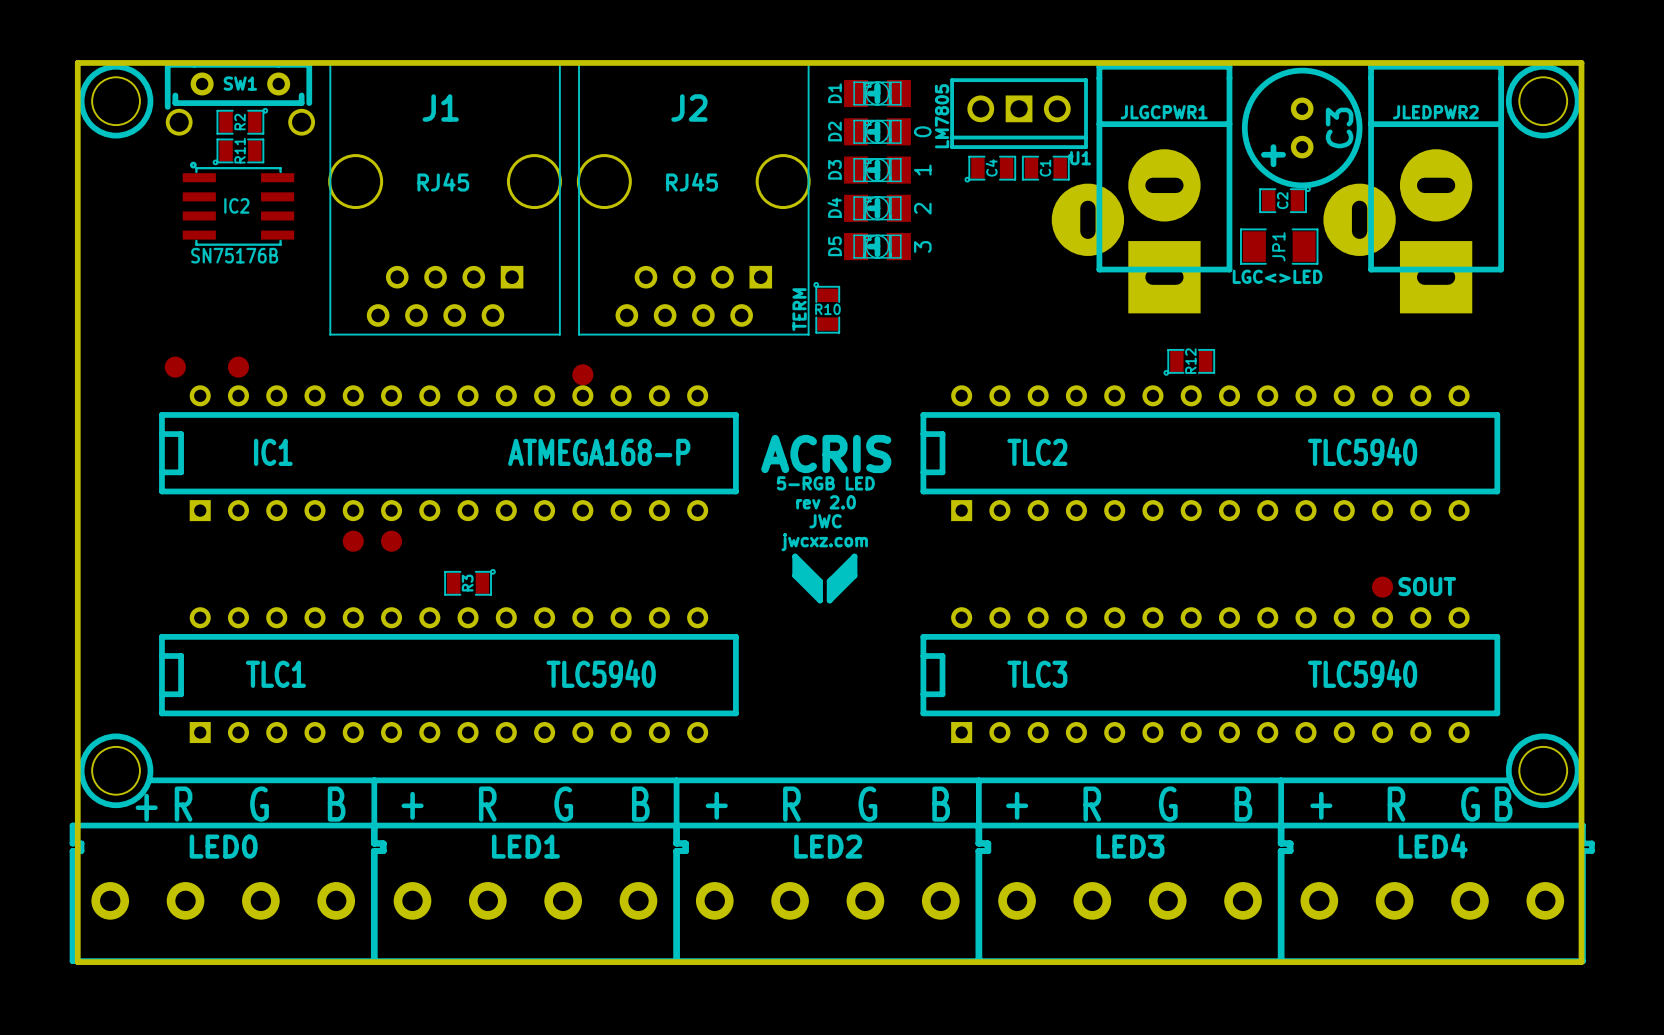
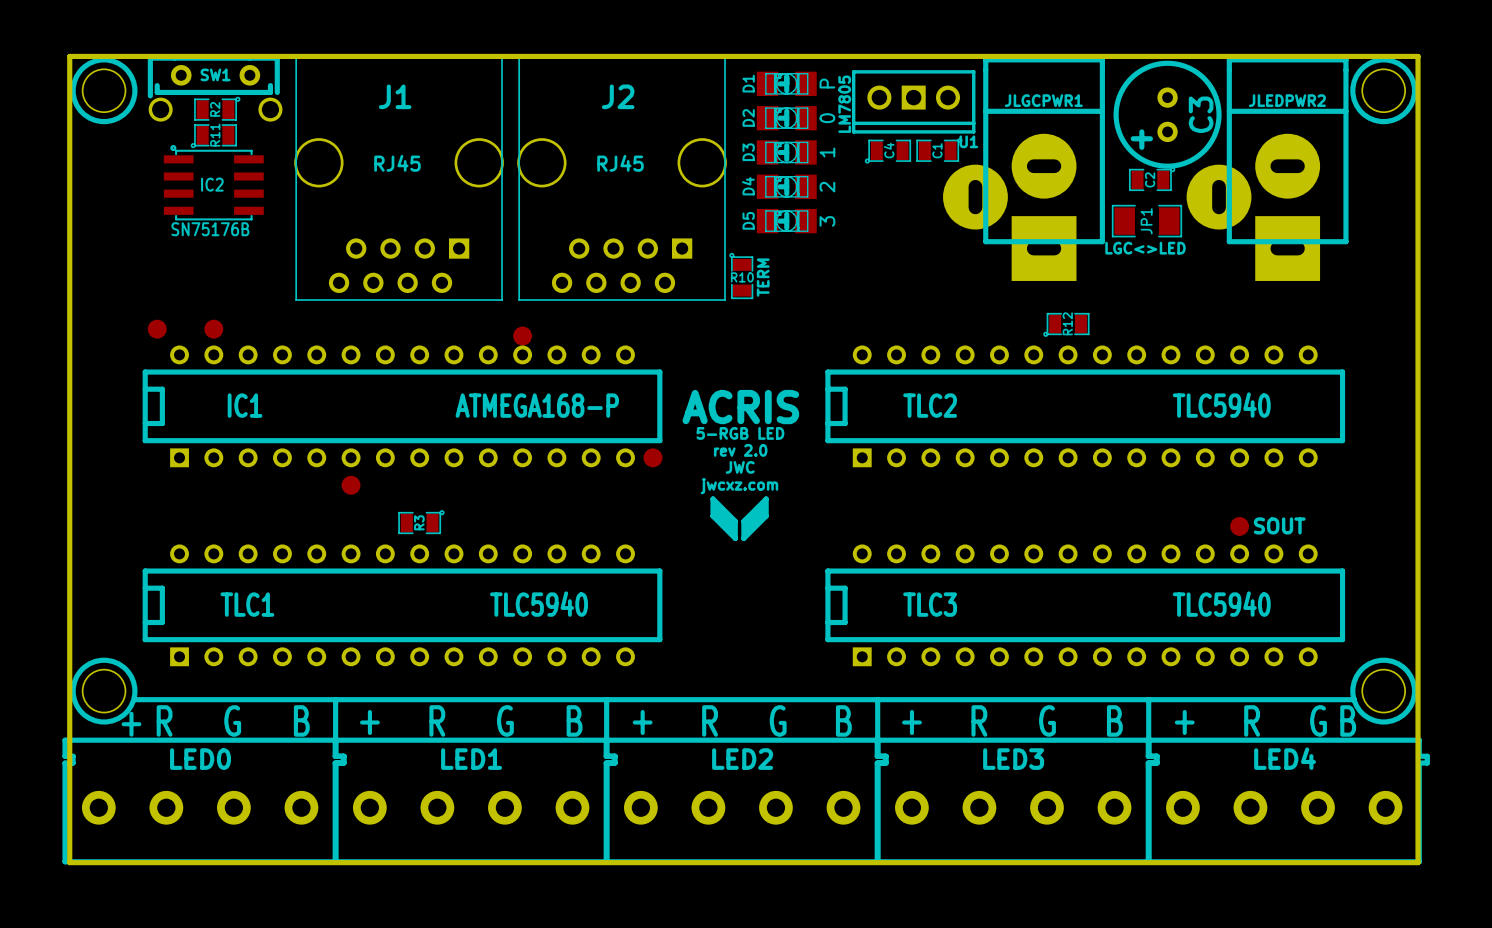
text: none -> P (827, 83)
text position: TERM (799, 309) -> TERM (763, 277)
part position: (353, 541) -> (652, 457)

